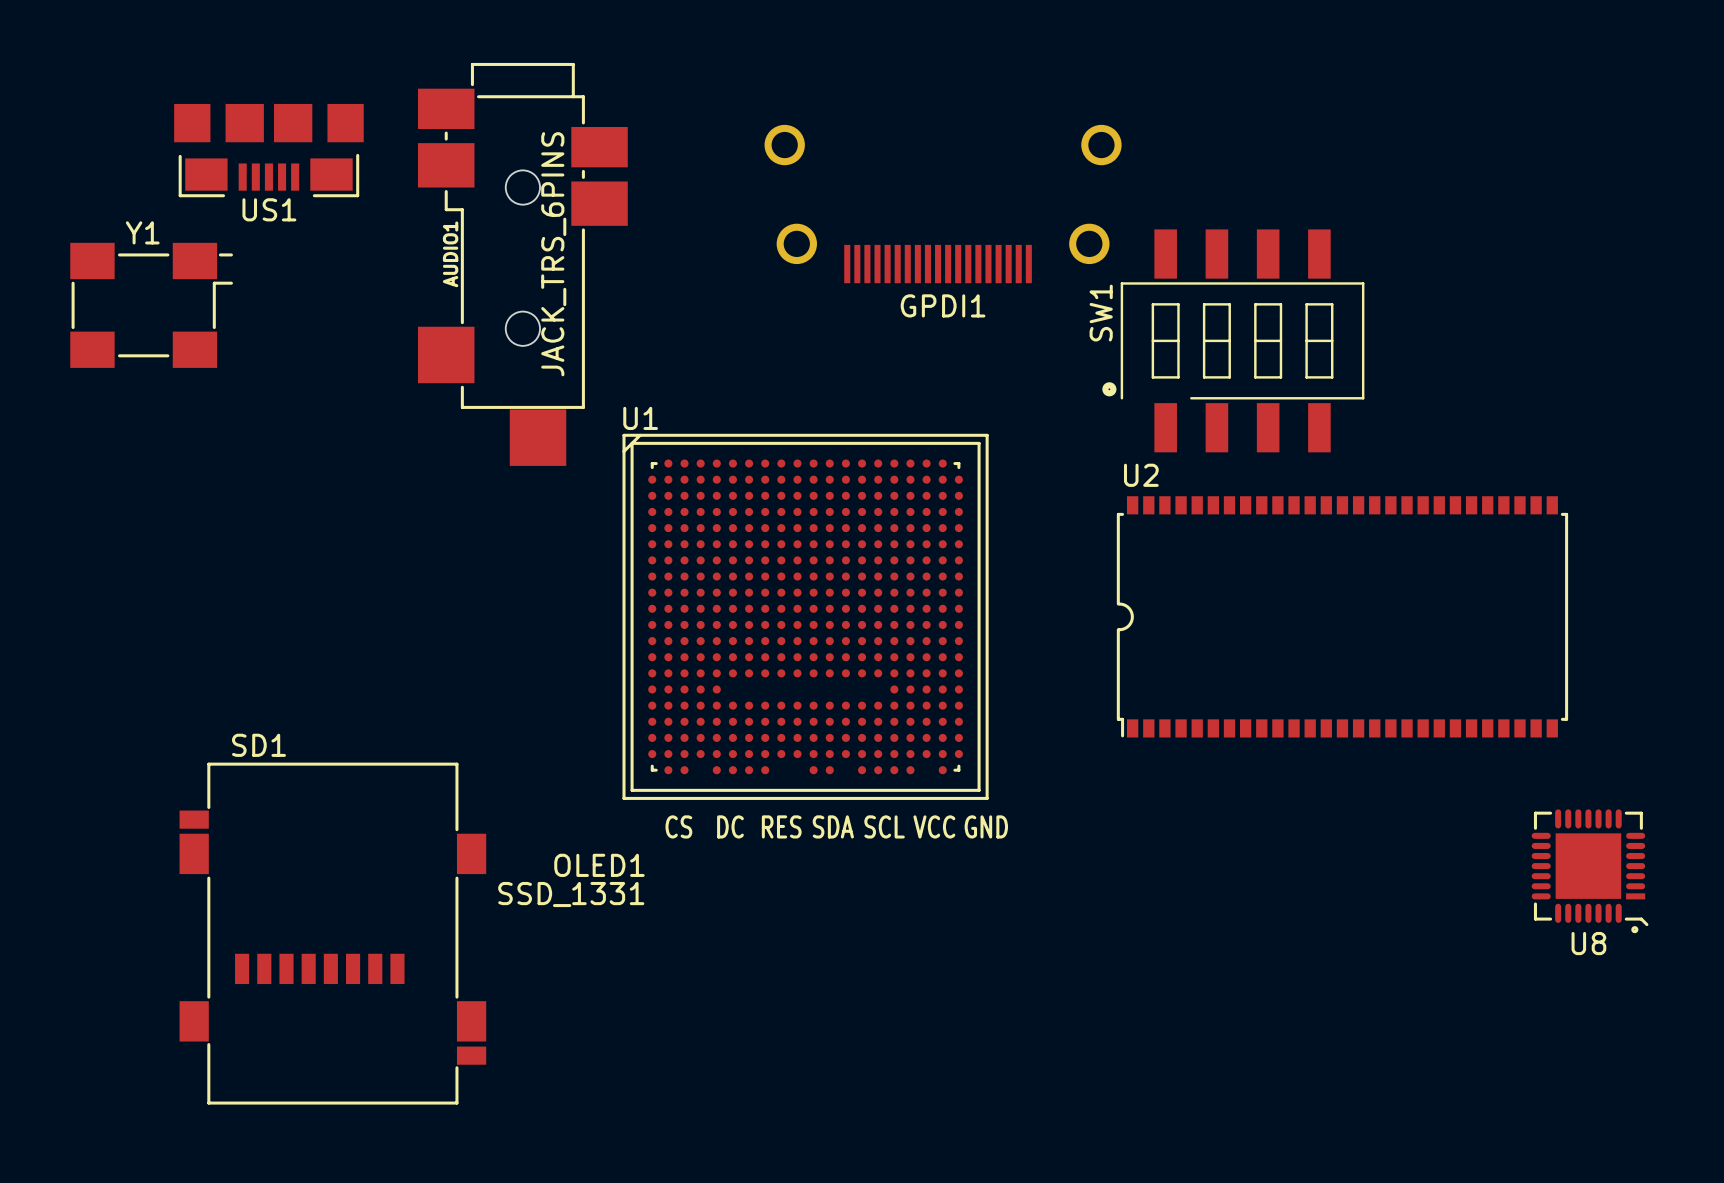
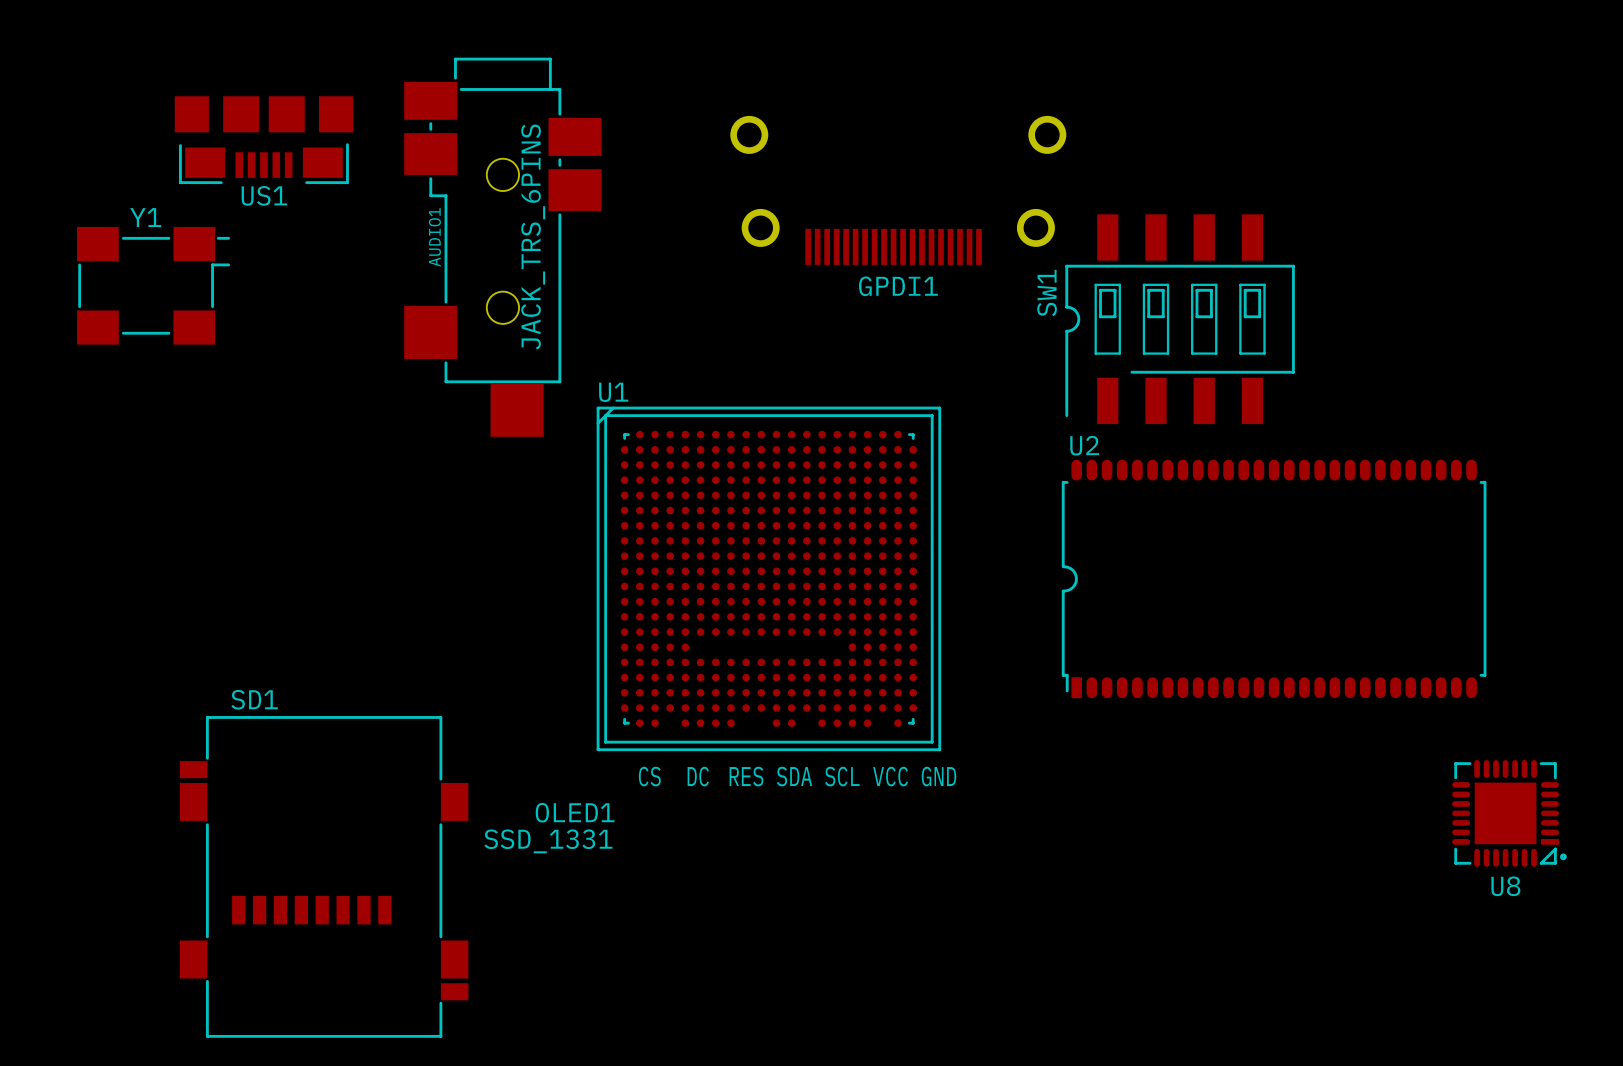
SW1 footprint: [1102, 229, 1365, 453] -> [1065, 214, 1295, 425]
U2 footprint: [1116, 496, 1569, 738] -> [1061, 459, 1487, 699]
U8 footprint: [1531, 809, 1649, 934] -> [1452, 759, 1567, 867]

